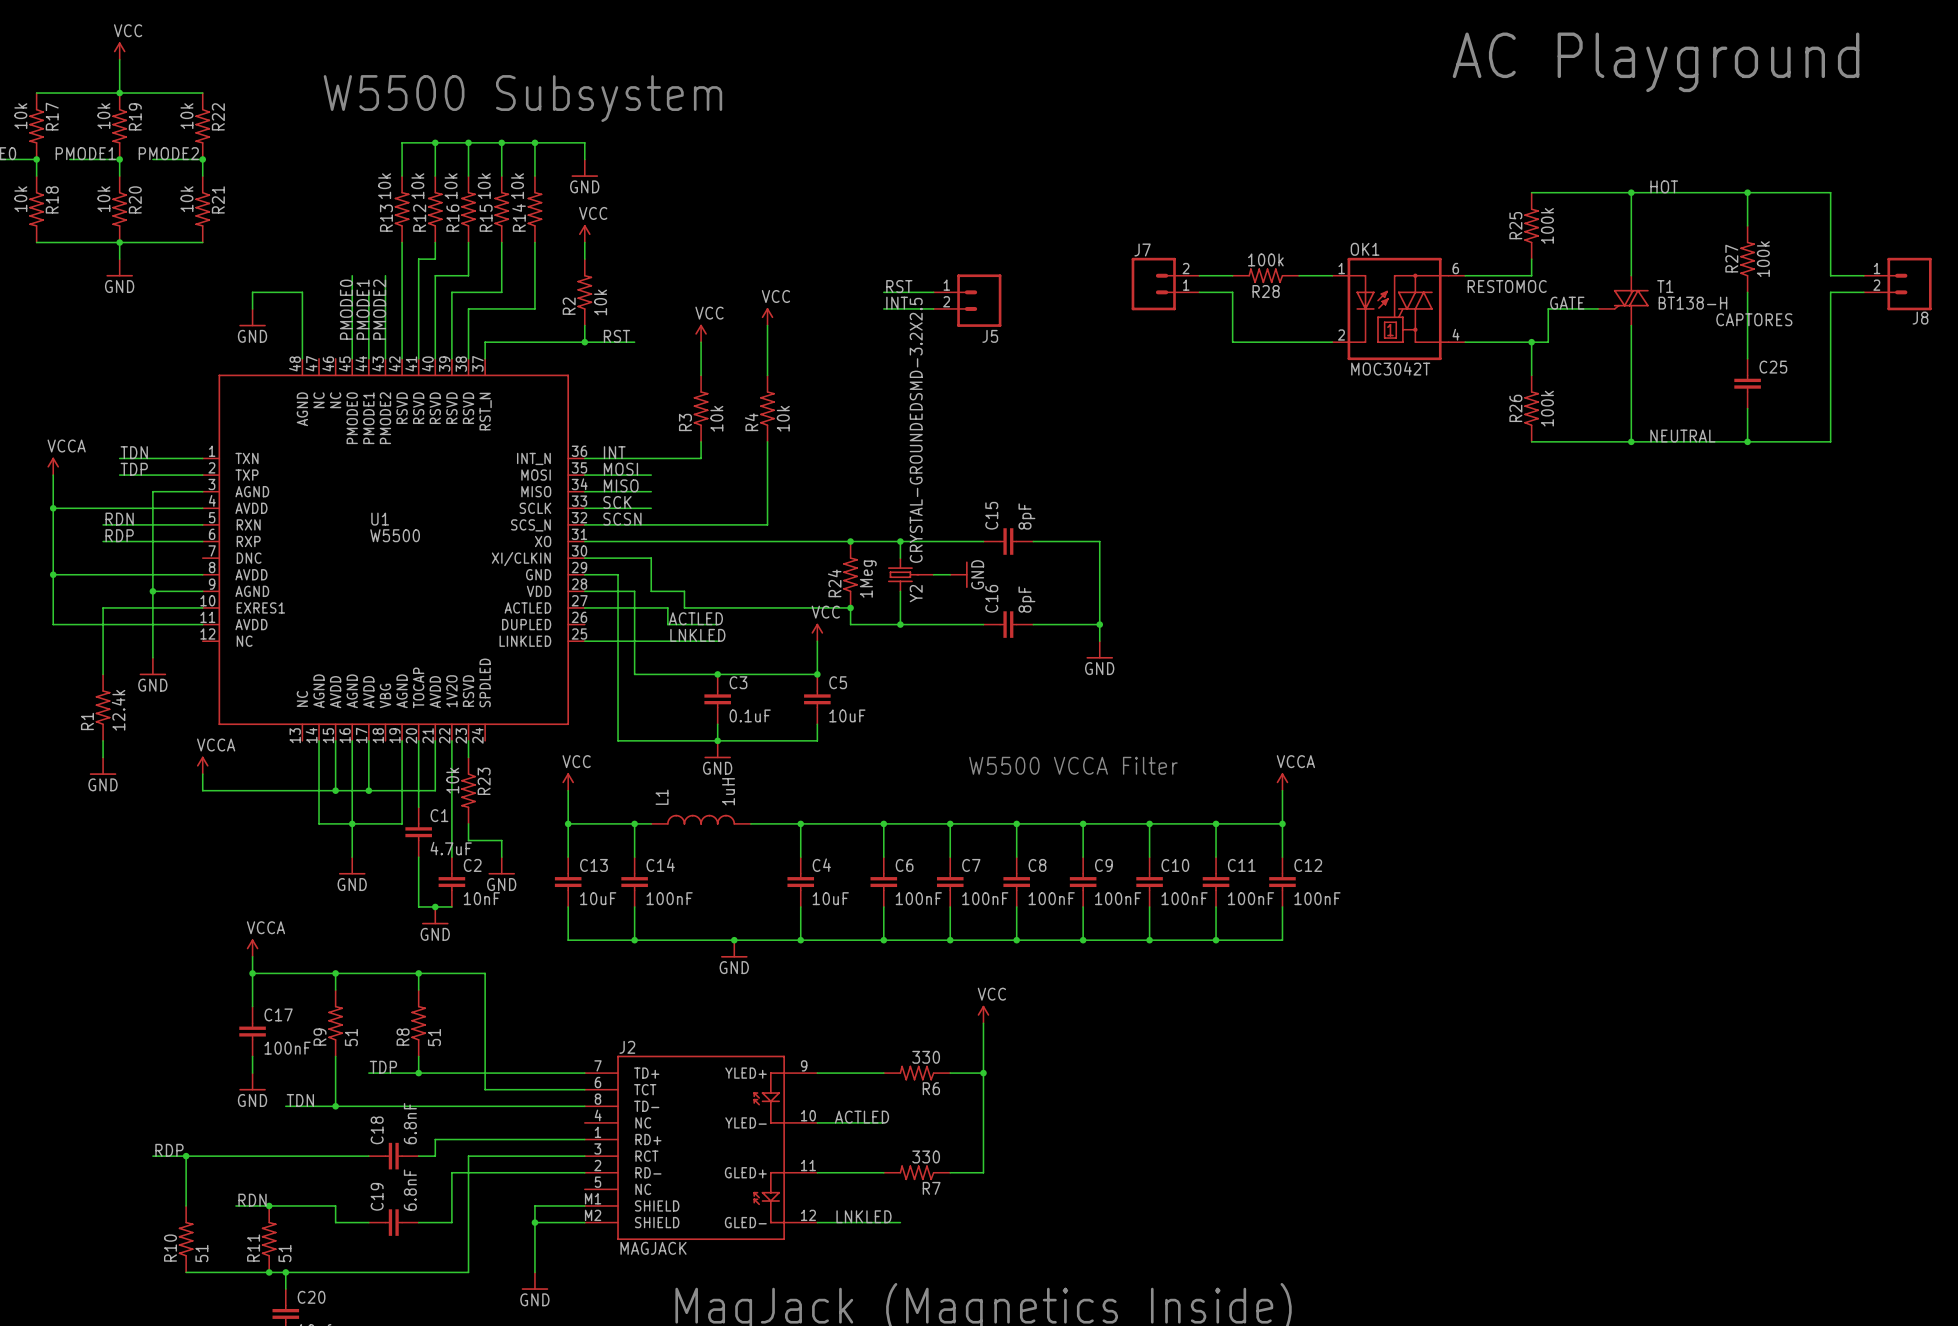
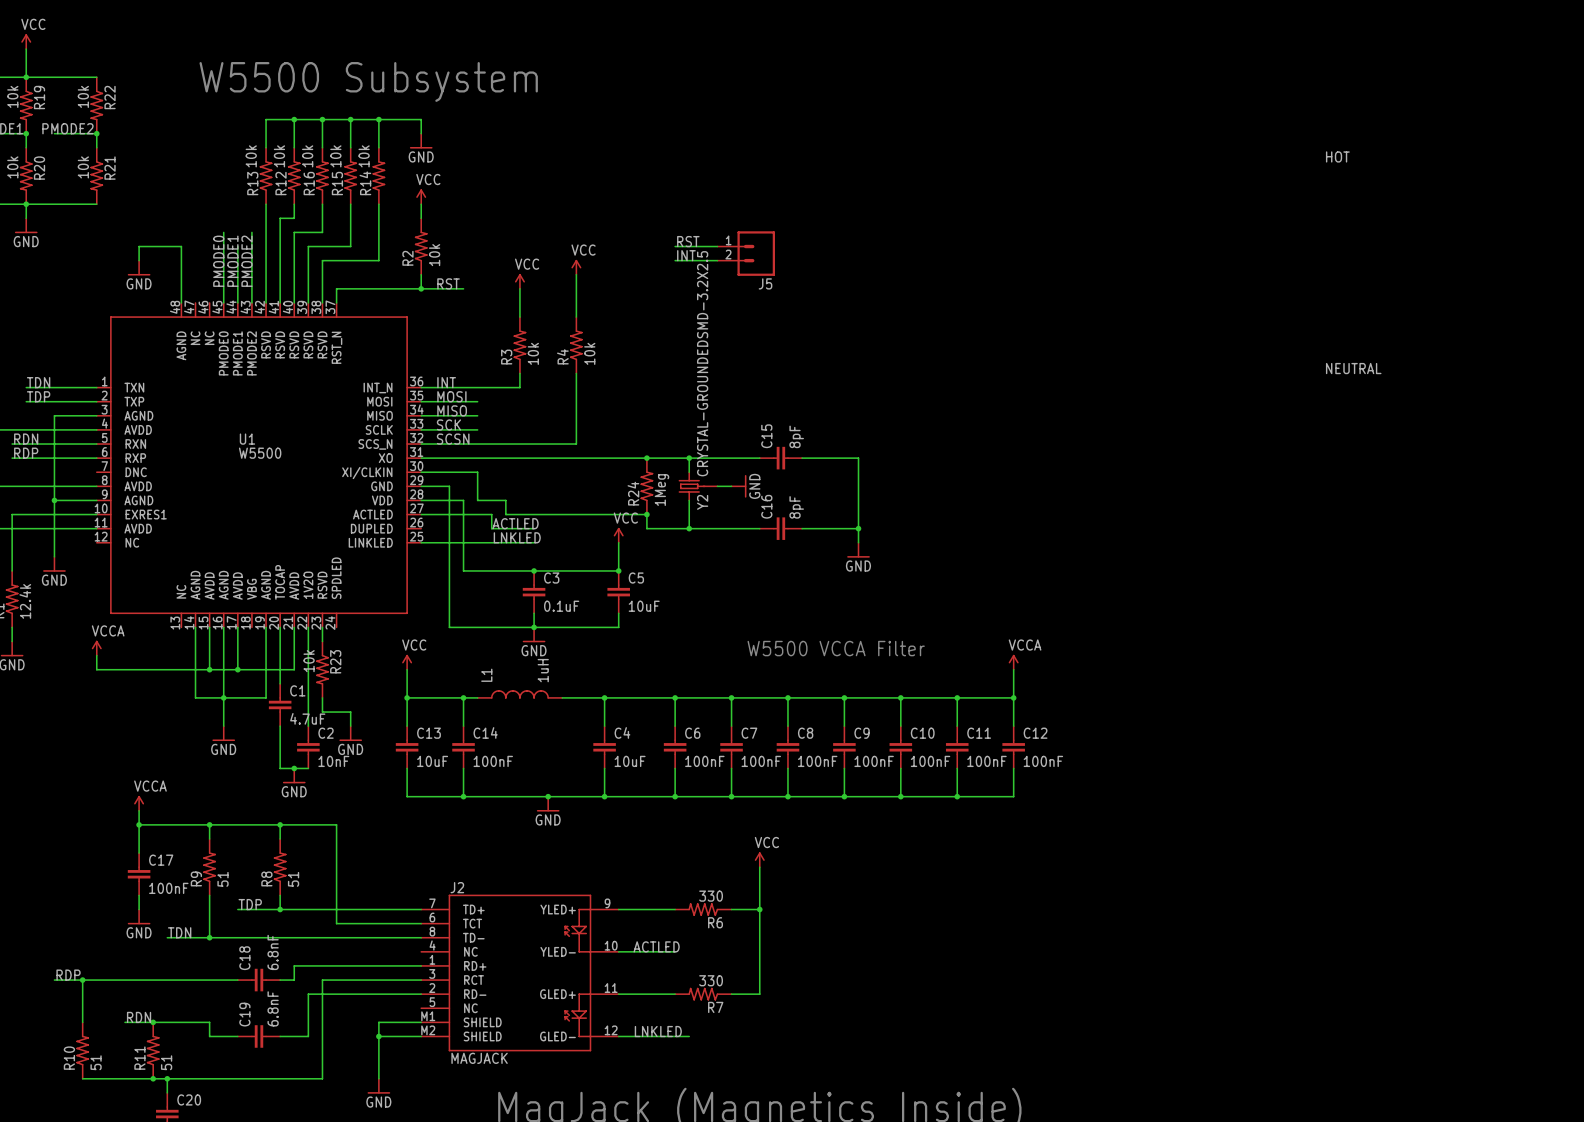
text: AC Playground (1656, 62) -> none
wire: (1531, 192) (1830, 192) (1830, 275) (1863, 275) -> none
wire: (1631, 192) (1631, 275) -> none
junction: (1631, 192) -> none
wire: (1747, 192) (1747, 225) -> none
junction: (1747, 192) -> none
R25: 100k (1531, 225) -> none
wire: (1531, 259) (1531, 275) (1465, 275) -> none
R27: 100k (1747, 259) -> none
wire: (1199, 275) (1232, 275) -> none
R28: 100k (1265, 275) -> none
wire: (1299, 275) (1332, 275) -> none
J7: (1165, 284) -> none
J8: (1897, 284) -> none
label: RESTOMOC (1507, 286) -> none
wire: (1199, 292) (1232, 292) (1232, 342) (1332, 342) -> none
wire: (1747, 292) (1747, 358) -> none
wire: (1863, 292) (1830, 292) (1830, 441) (1531, 441) -> none
T1: BT138-H (1623, 300) -> none
label: GATE (1567, 303) -> none
OK1: MOC3042T (1398, 308) -> none
wire: (1598, 308) (1548, 308) (1548, 342) (1465, 342) -> none
label: CAPTORES (1754, 319) -> none
wire: (1631, 325) (1631, 441) -> none
wire: (1531, 342) (1531, 375) -> none
junction: (1531, 342) -> none
C25: (1747, 383) -> none
R26: 100k (1531, 408) -> none
wire: (1747, 408) (1747, 441) -> none
junction: (1631, 441) -> none
junction: (1747, 441) -> none

